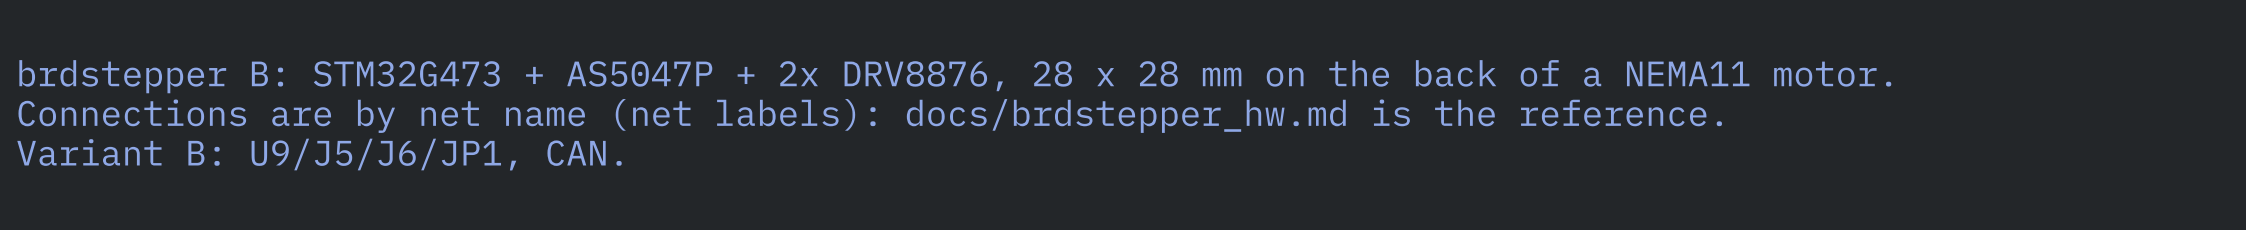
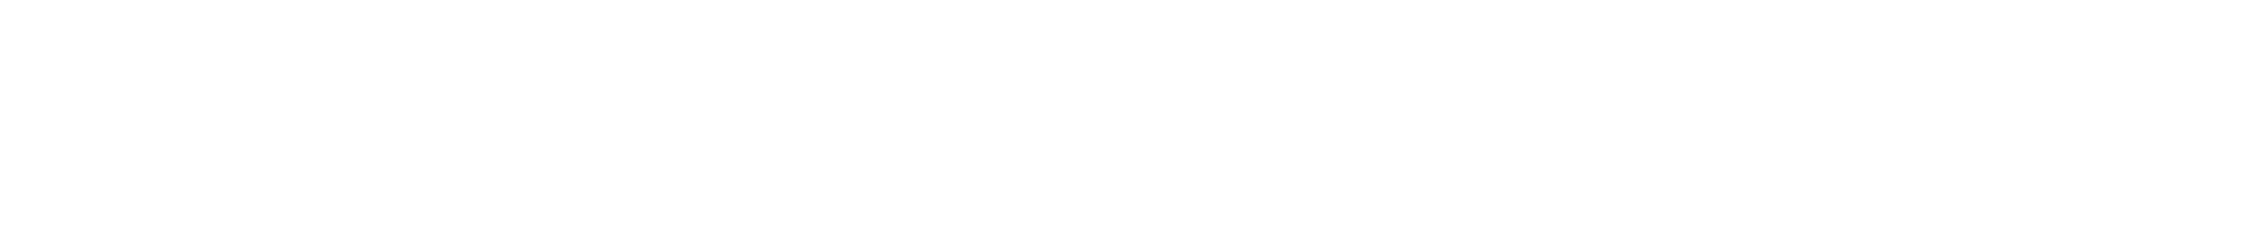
text: brdstepper B: STM32G473 + AS5047P + 2x DRV8876, 28 x 28 mm on the back of a NEMA11 motor. (955, 76) -> none
text: Connections are by net name (net labels): docs/brdstepper_hw.md is the reference. (870, 115) -> none
text: Variant B: U9/J5/J6/JP1, CAN. (319, 154) -> none

